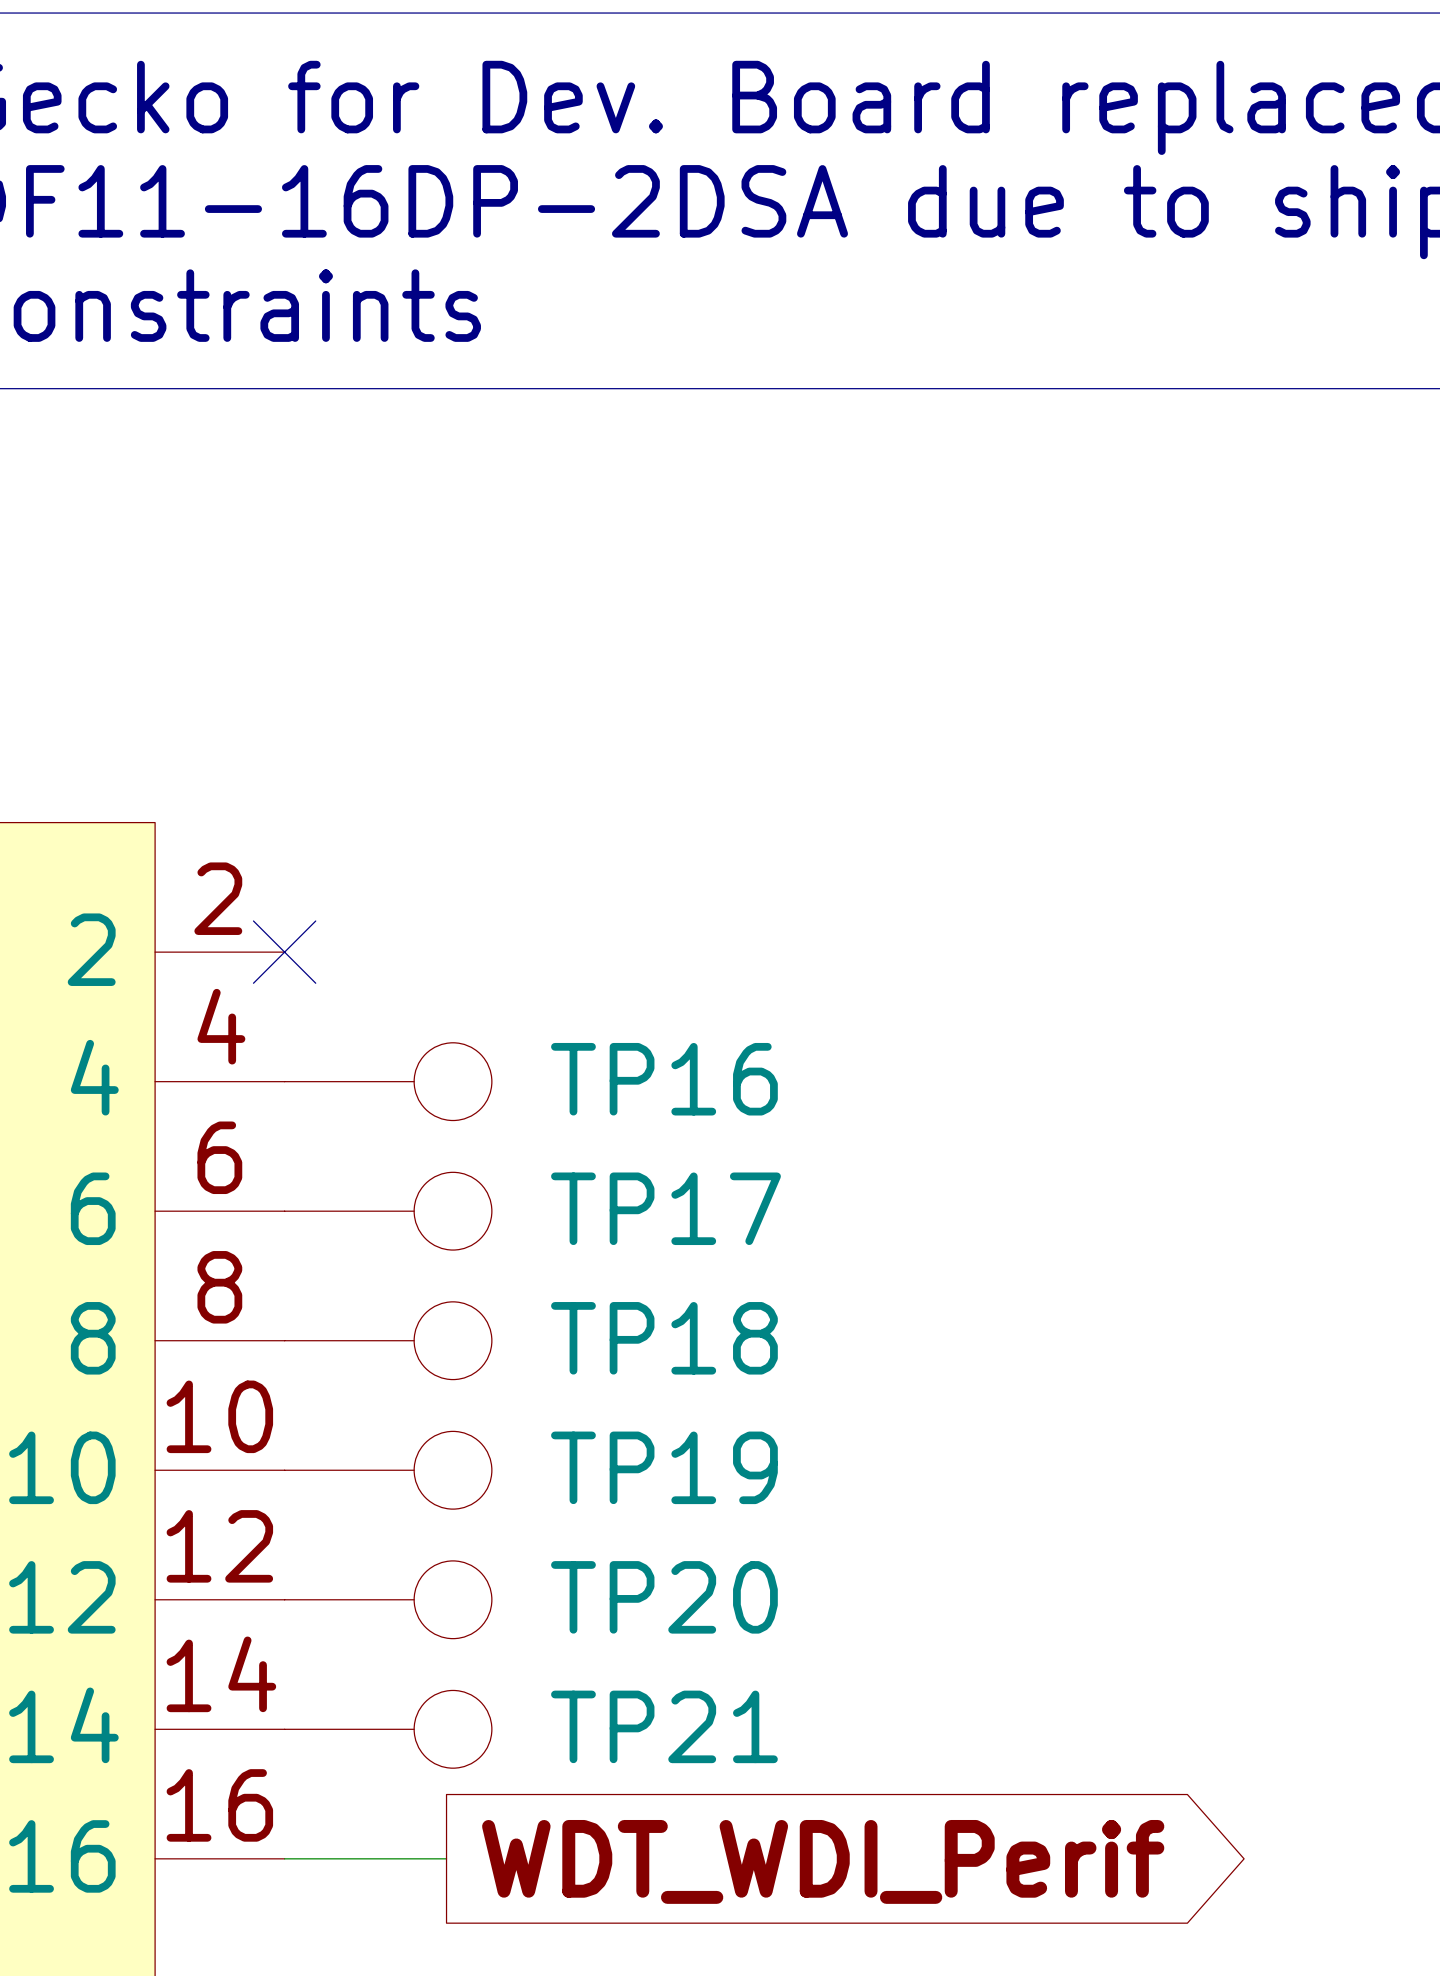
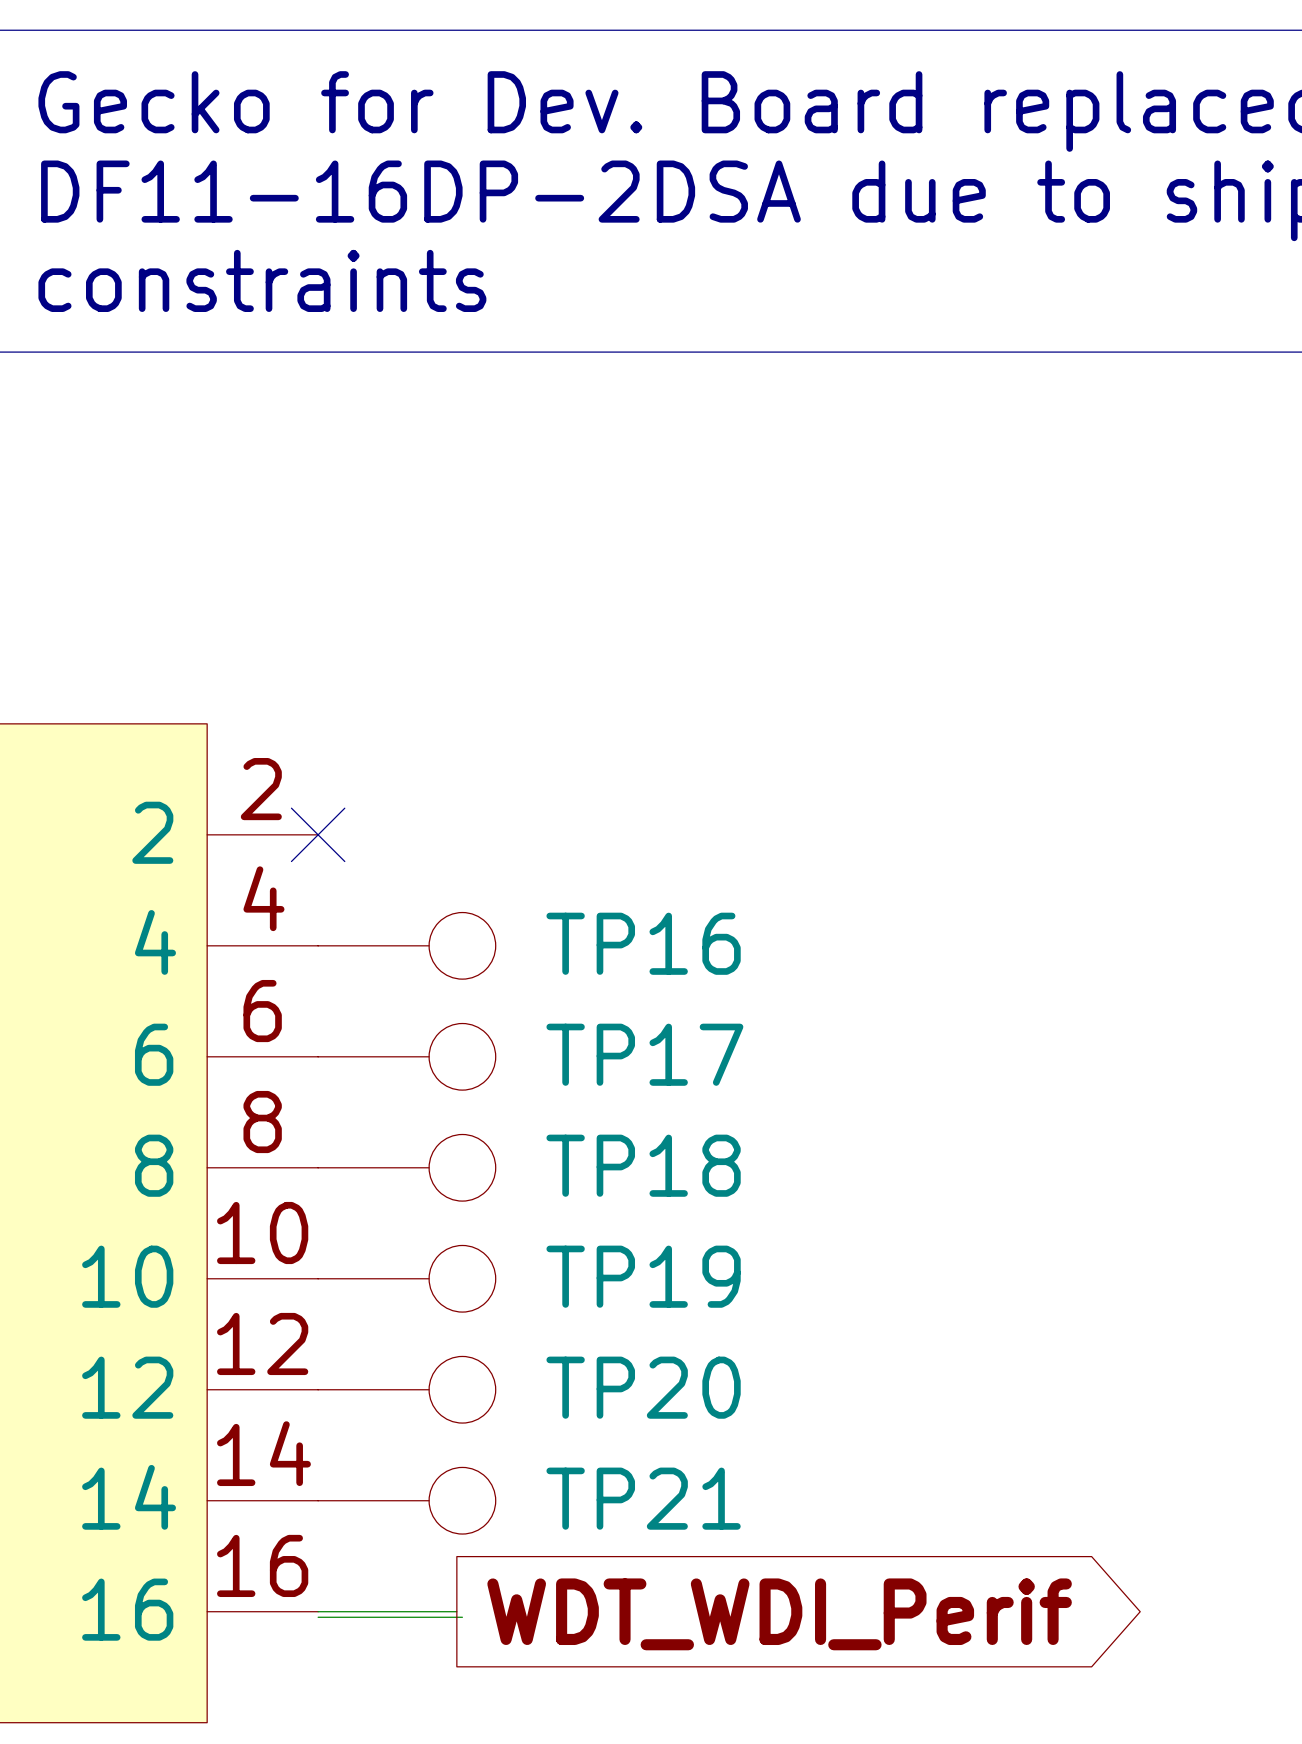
wire: none -> (318, 1617) (462, 1617)

